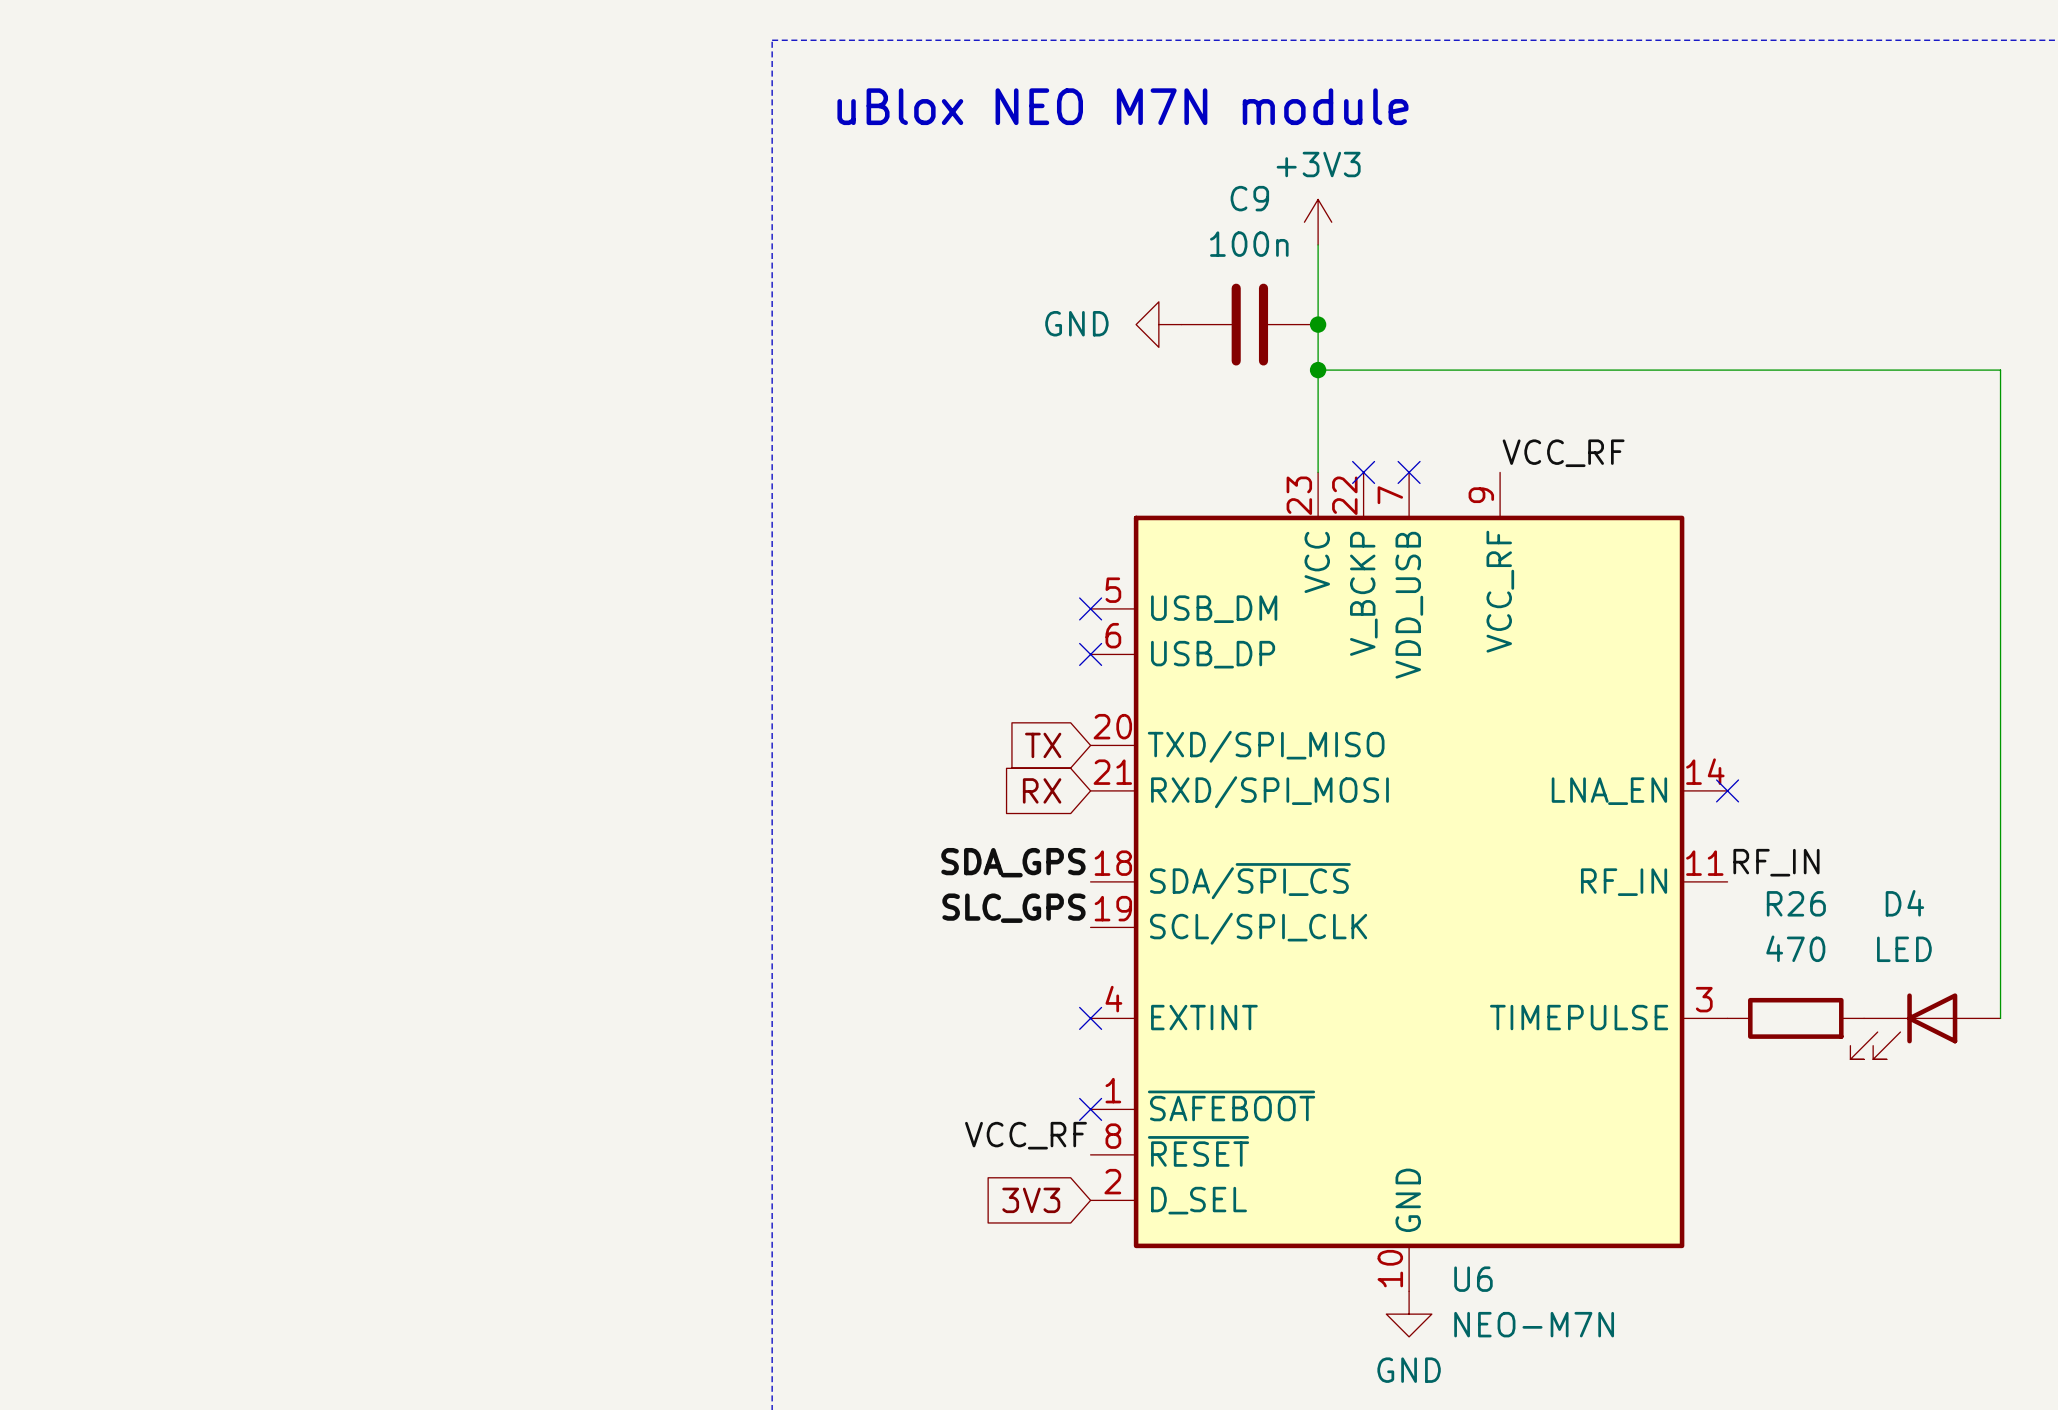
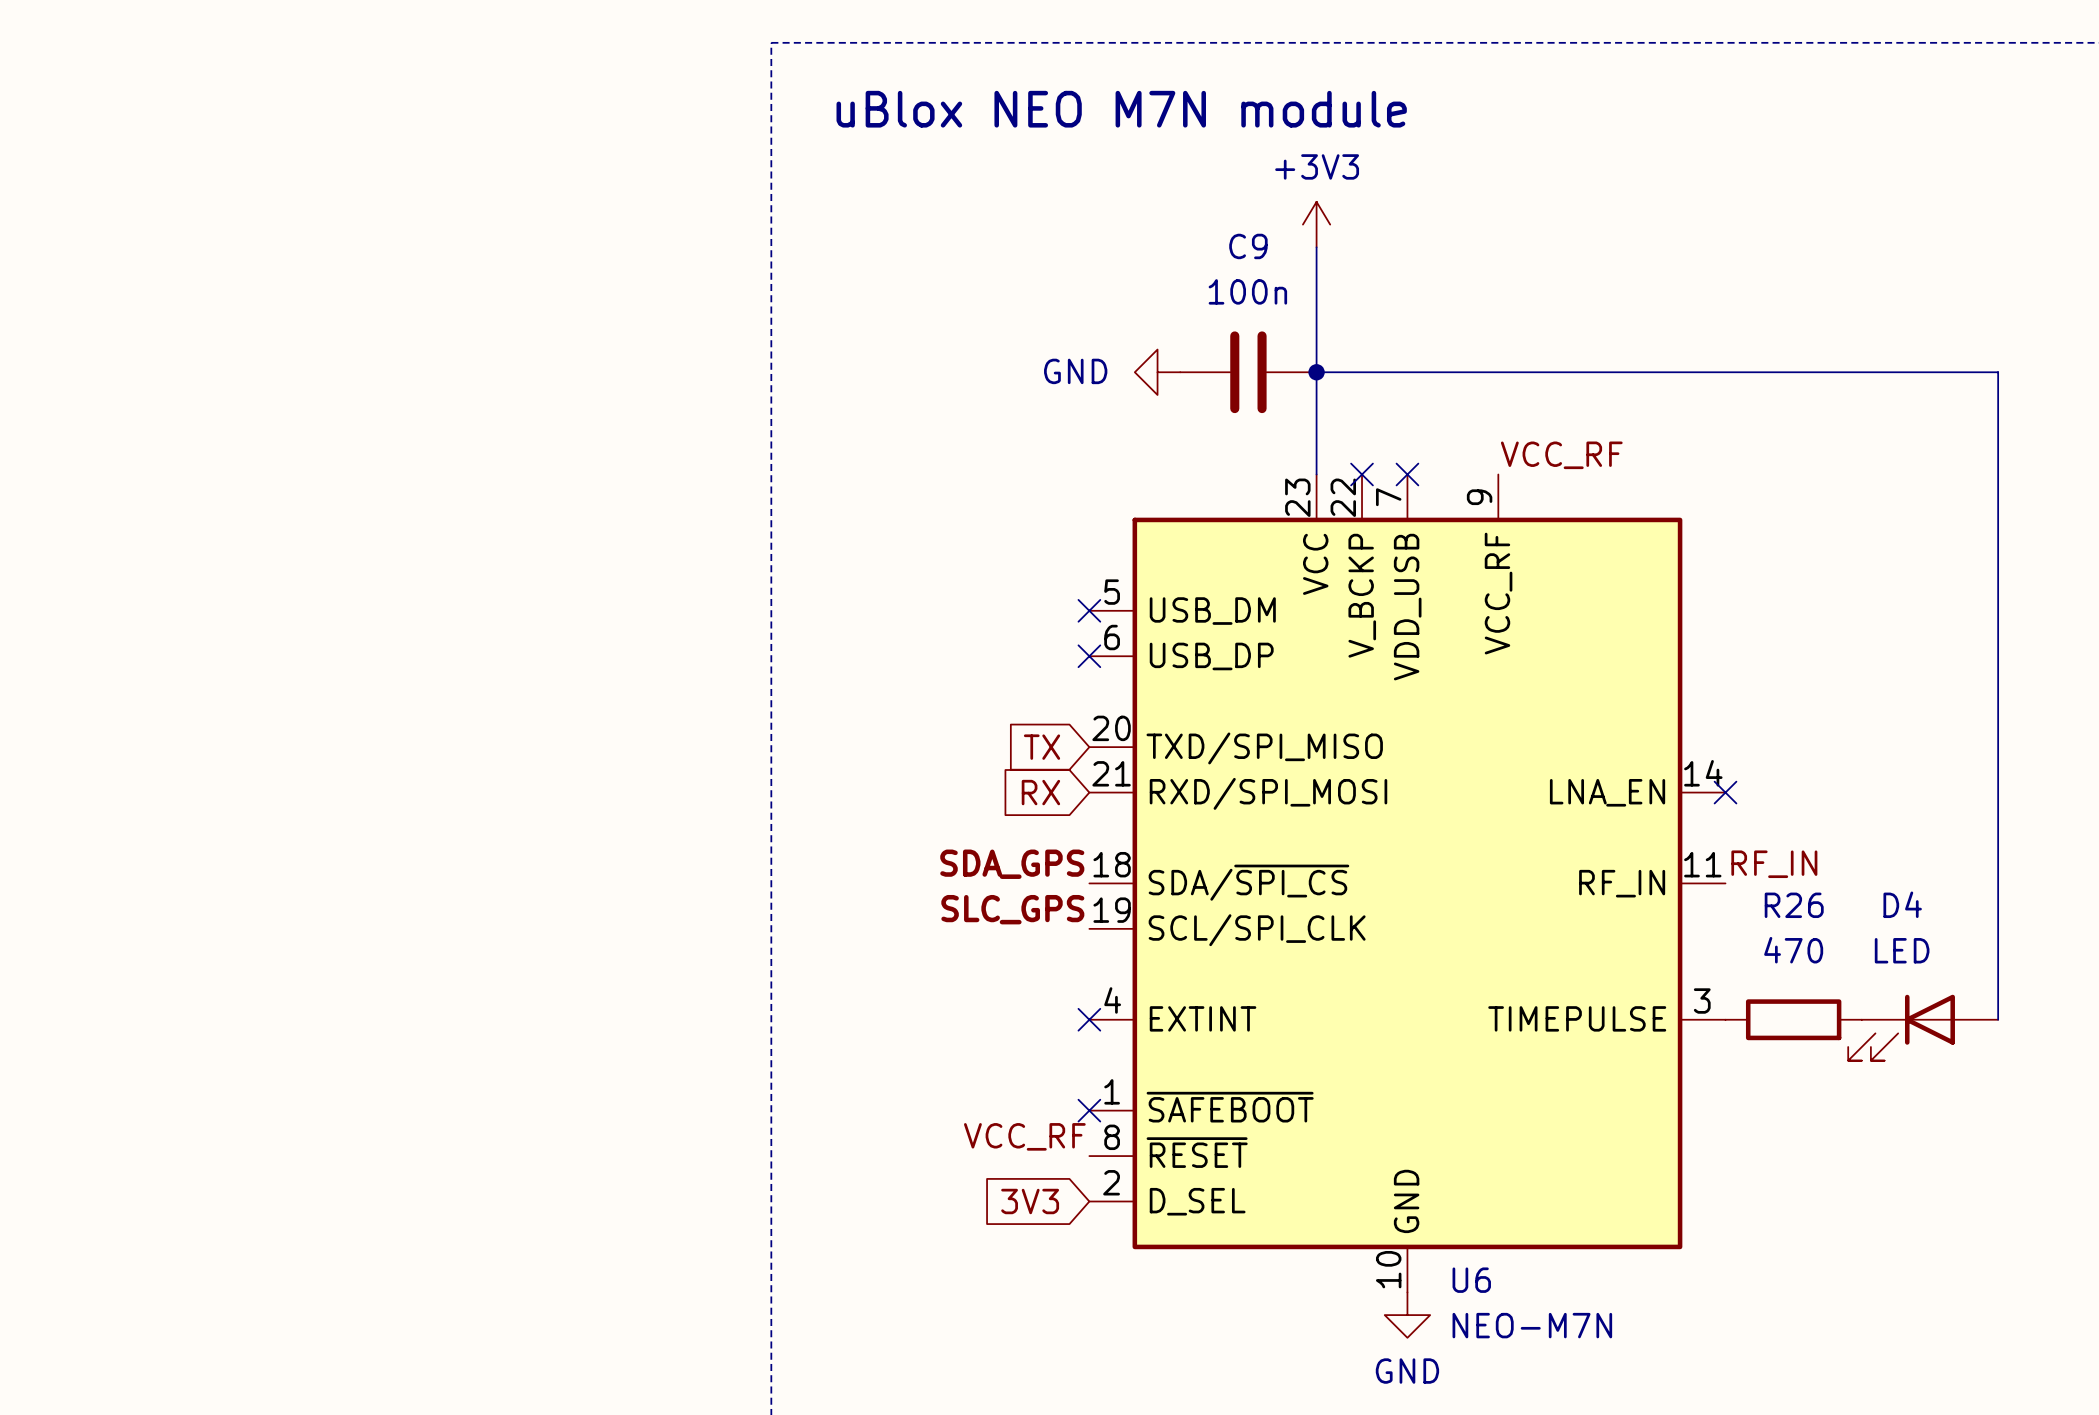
power symbol position: GND (1158, 324) -> GND (1157, 372)
C9 position: (1249, 324) -> (1248, 372)
junction: (1318, 324) -> none

